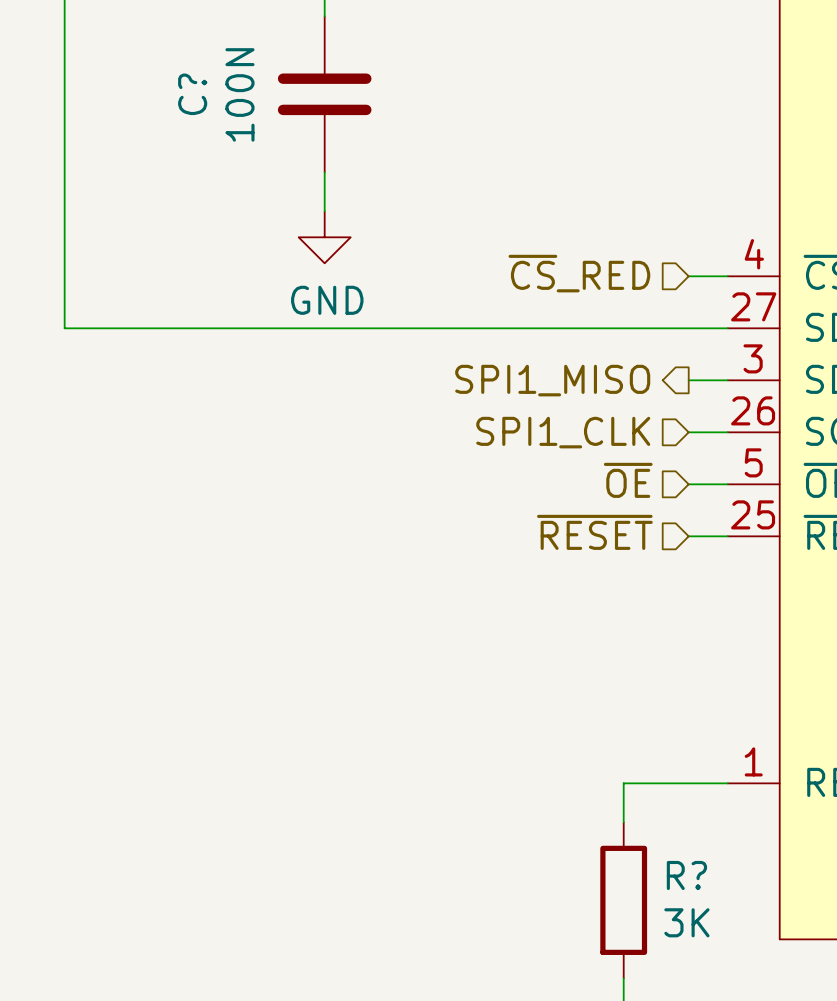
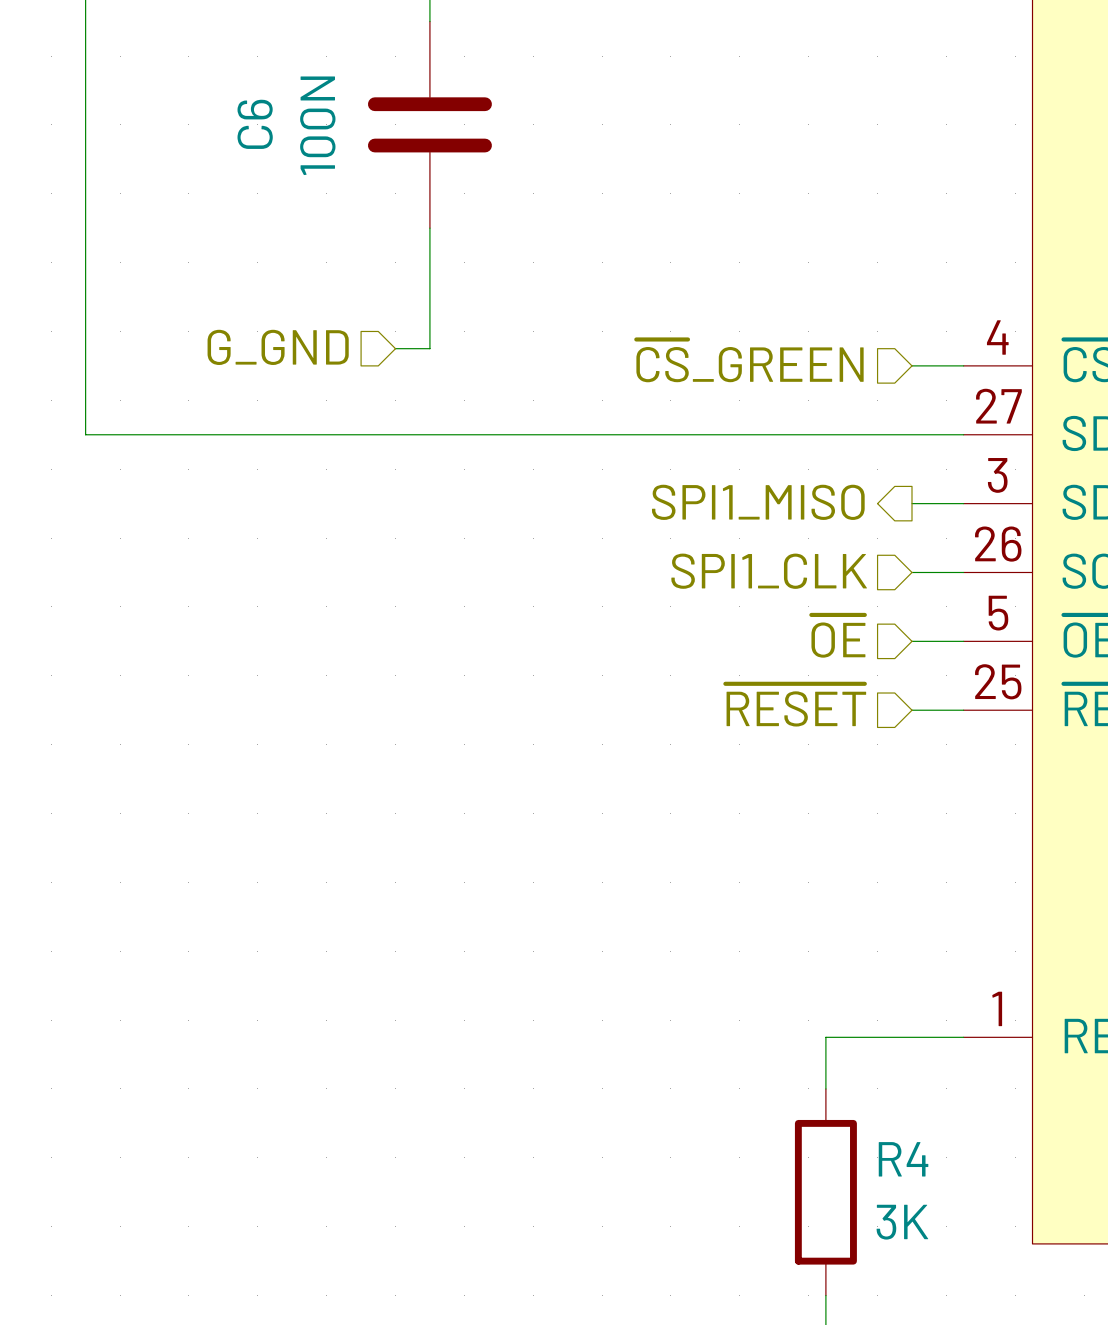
C? name: C? (192, 94) -> C6 (255, 124)
wire: none -> (429, 279) (429, 348) (395, 348)
power symbol: GND (324, 237) -> none
hierarchical label: none -> G_GND (278, 347)
hierarchical label: ~{CS}_RED (579, 273) -> ~{CS}_GREEN (749, 360)
R? name: R? (686, 875) -> R4 (903, 1159)

